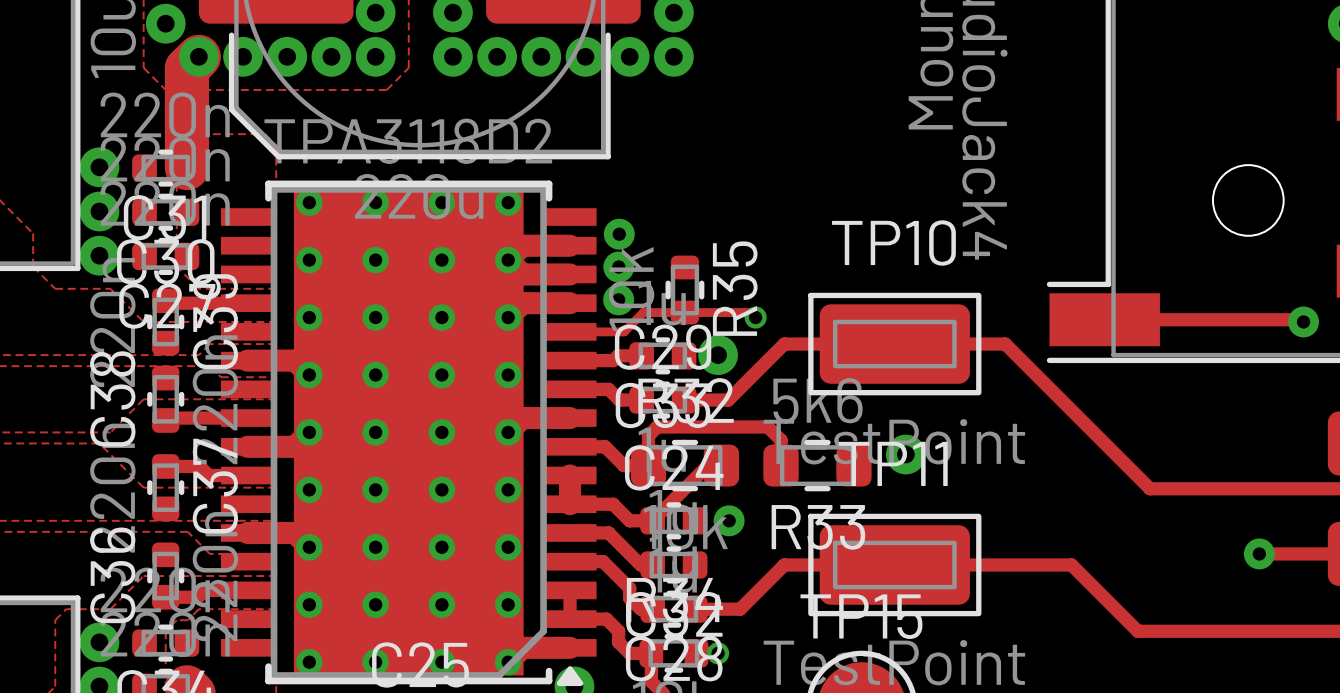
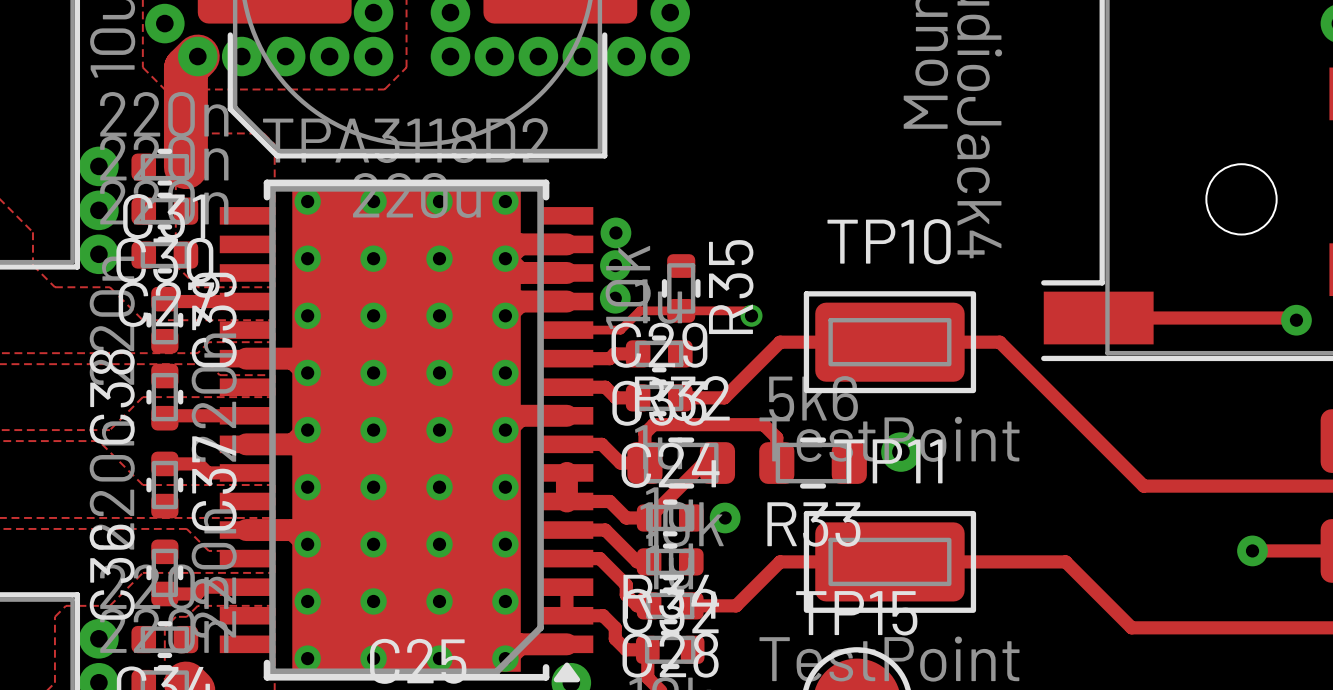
via: (718, 355) -> none
via: (718, 653) -> none

